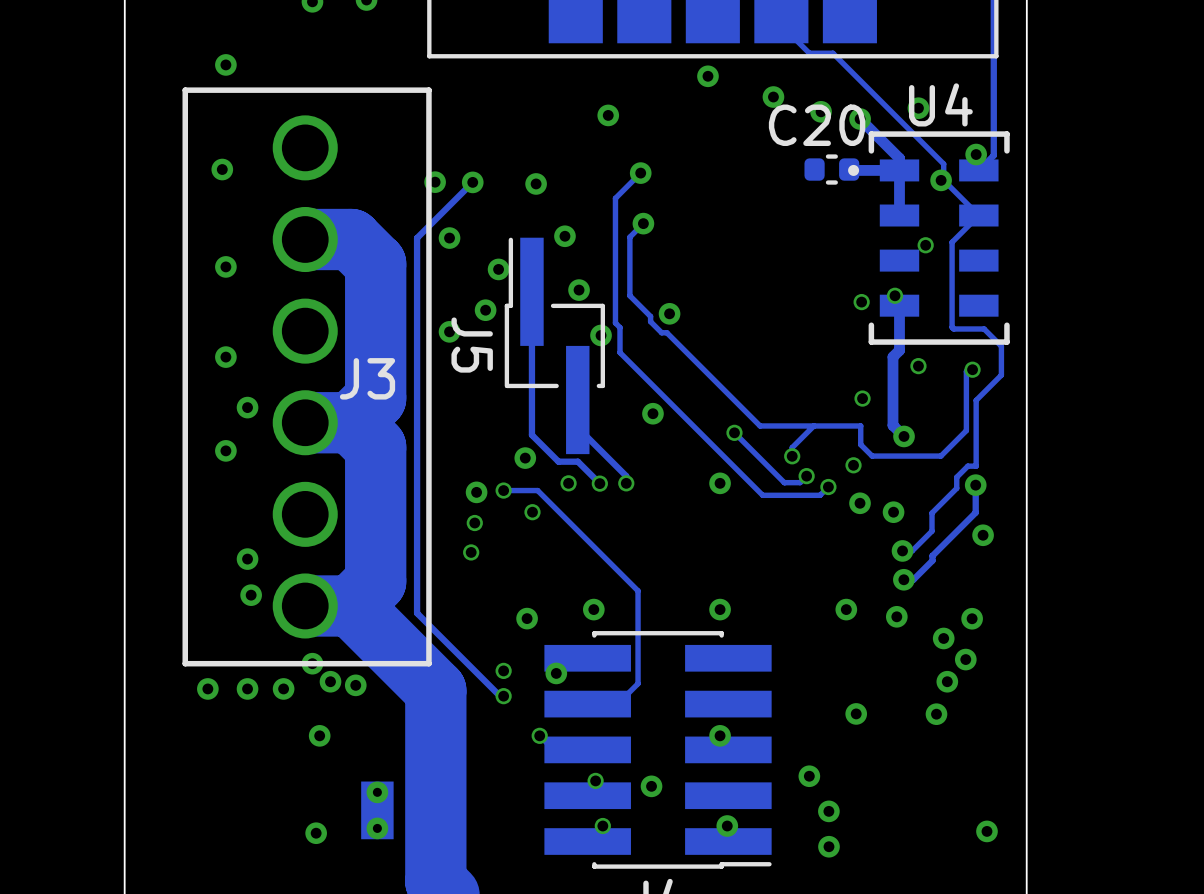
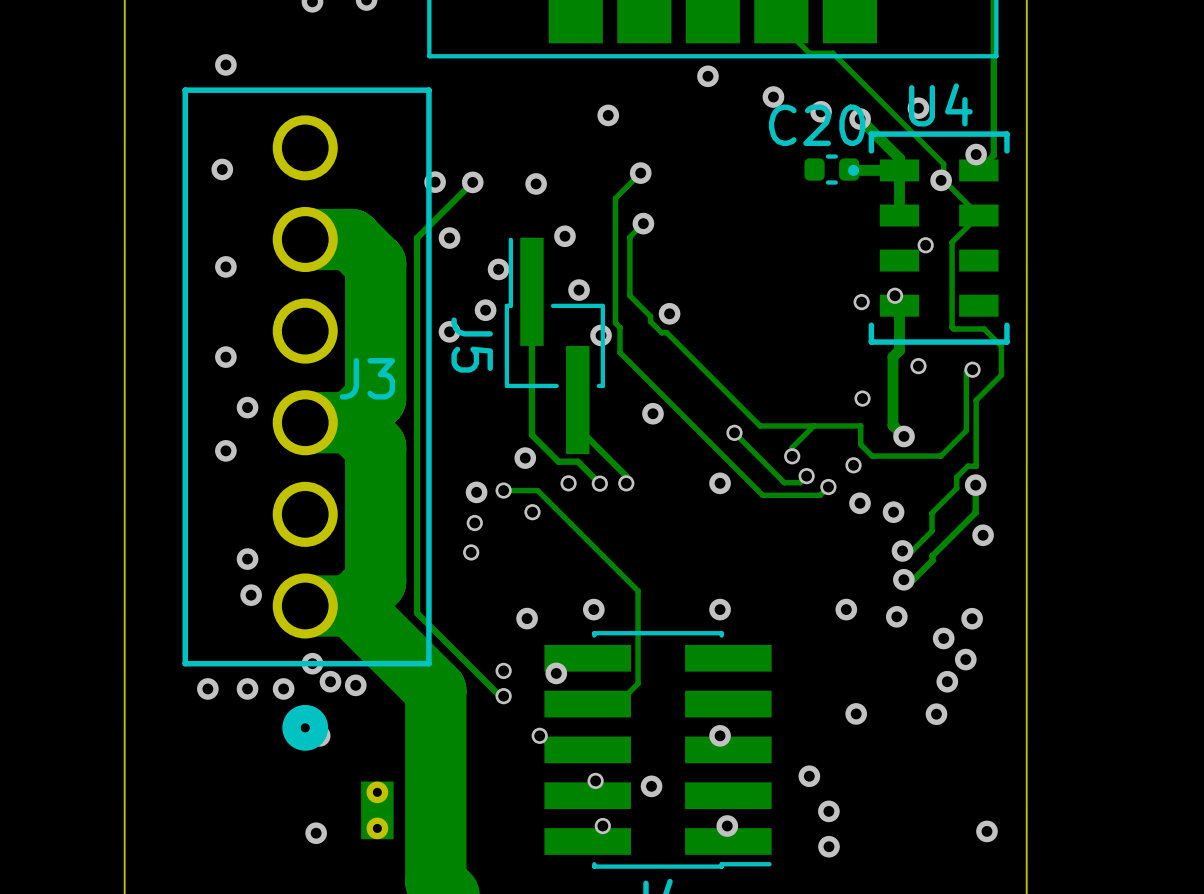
J3 footprint: [182, 87, 432, 667] -> [182, 87, 432, 751]

